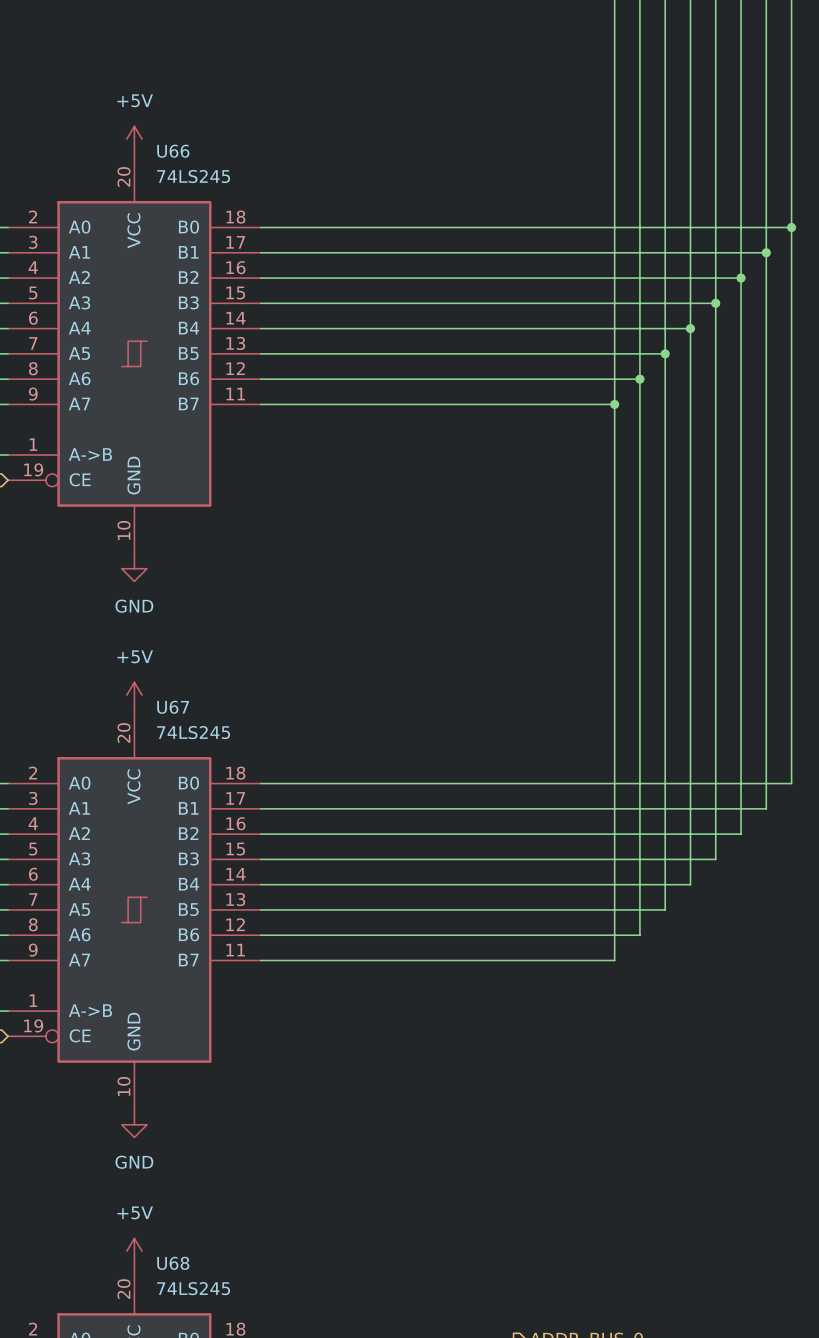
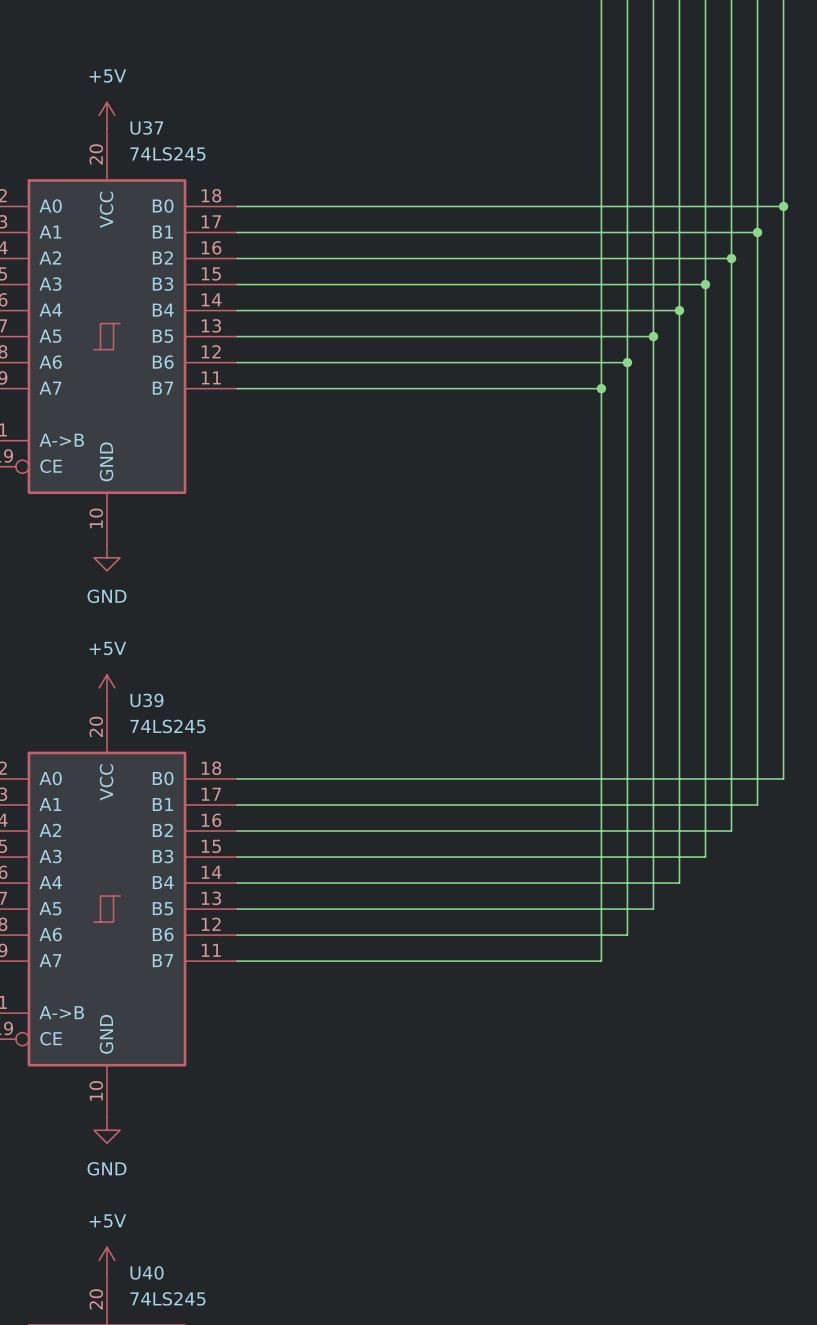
U66 name: U66 (173, 151) -> U37 (146, 127)
U67 name: U67 (173, 707) -> U39 (146, 700)
U68 name: U68 (173, 1263) -> U40 (147, 1272)

